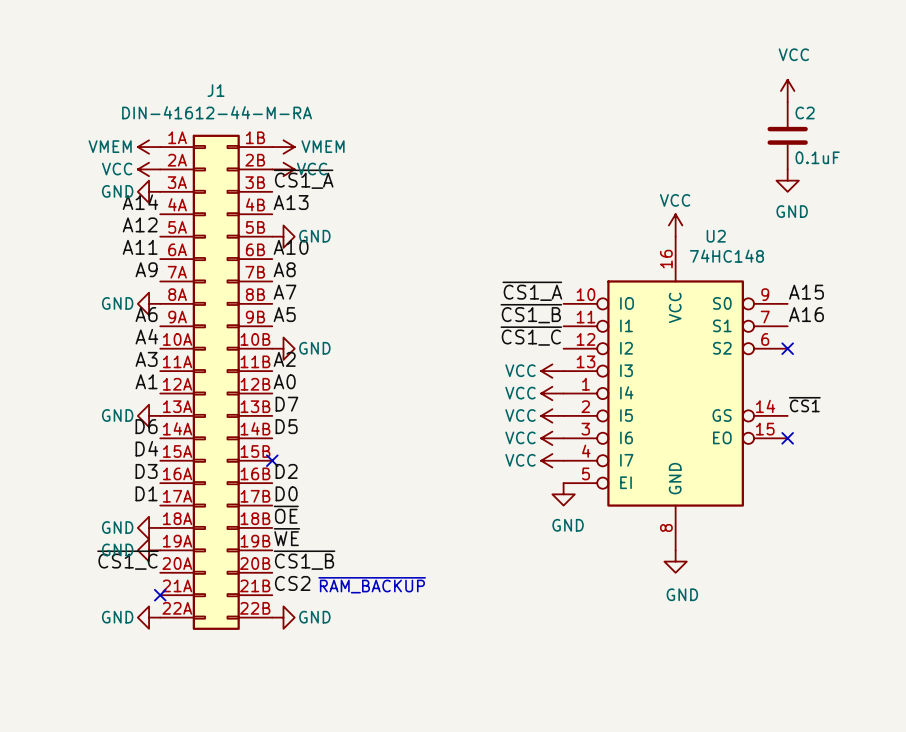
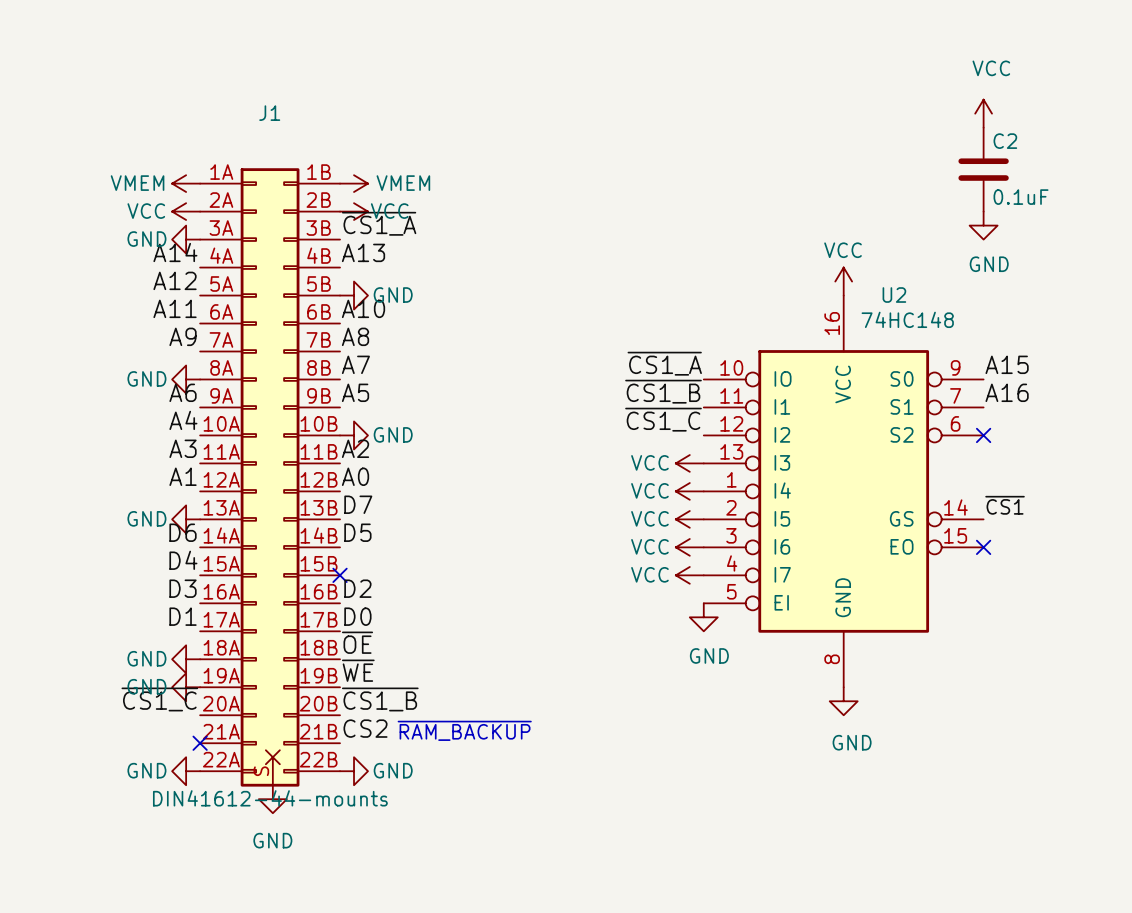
J1 value: DIN-41612-44-M-RA (217, 112) -> DIN41612-44-mounts (270, 798)
J1 symbol: [160, 134, 273, 630] -> [200, 168, 341, 787]
power symbol: none -> GND (272, 799)

